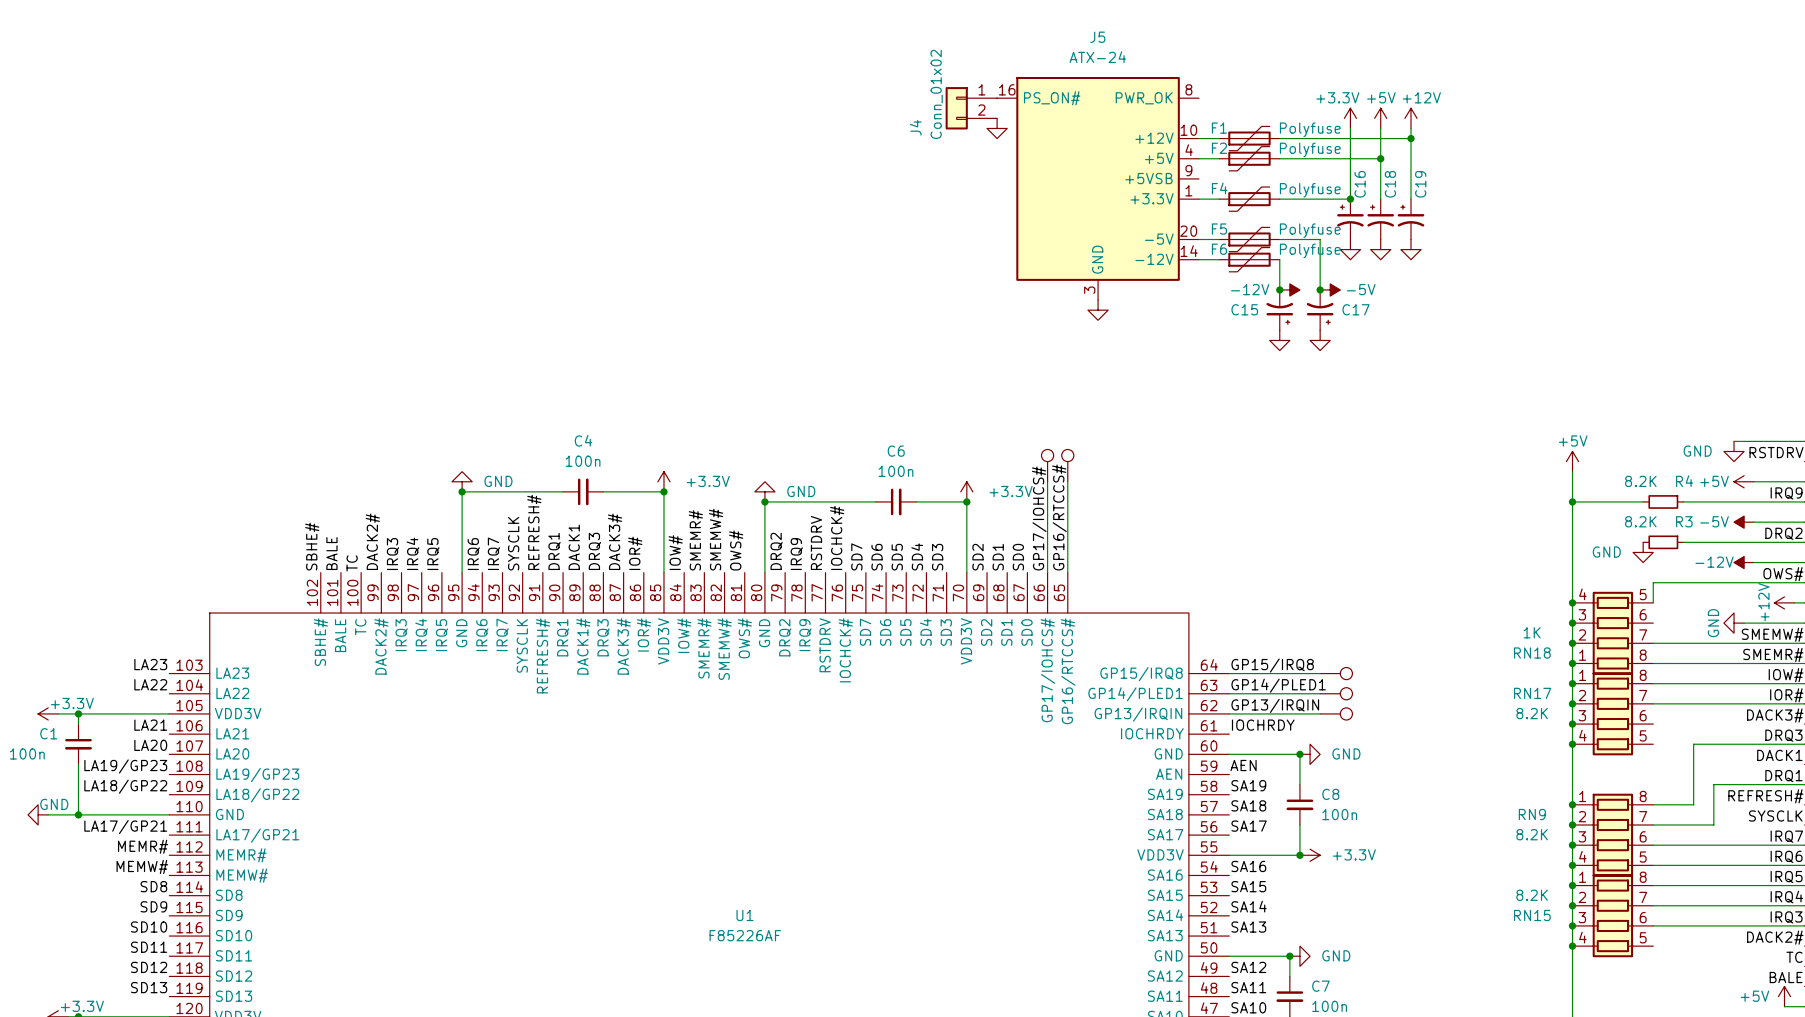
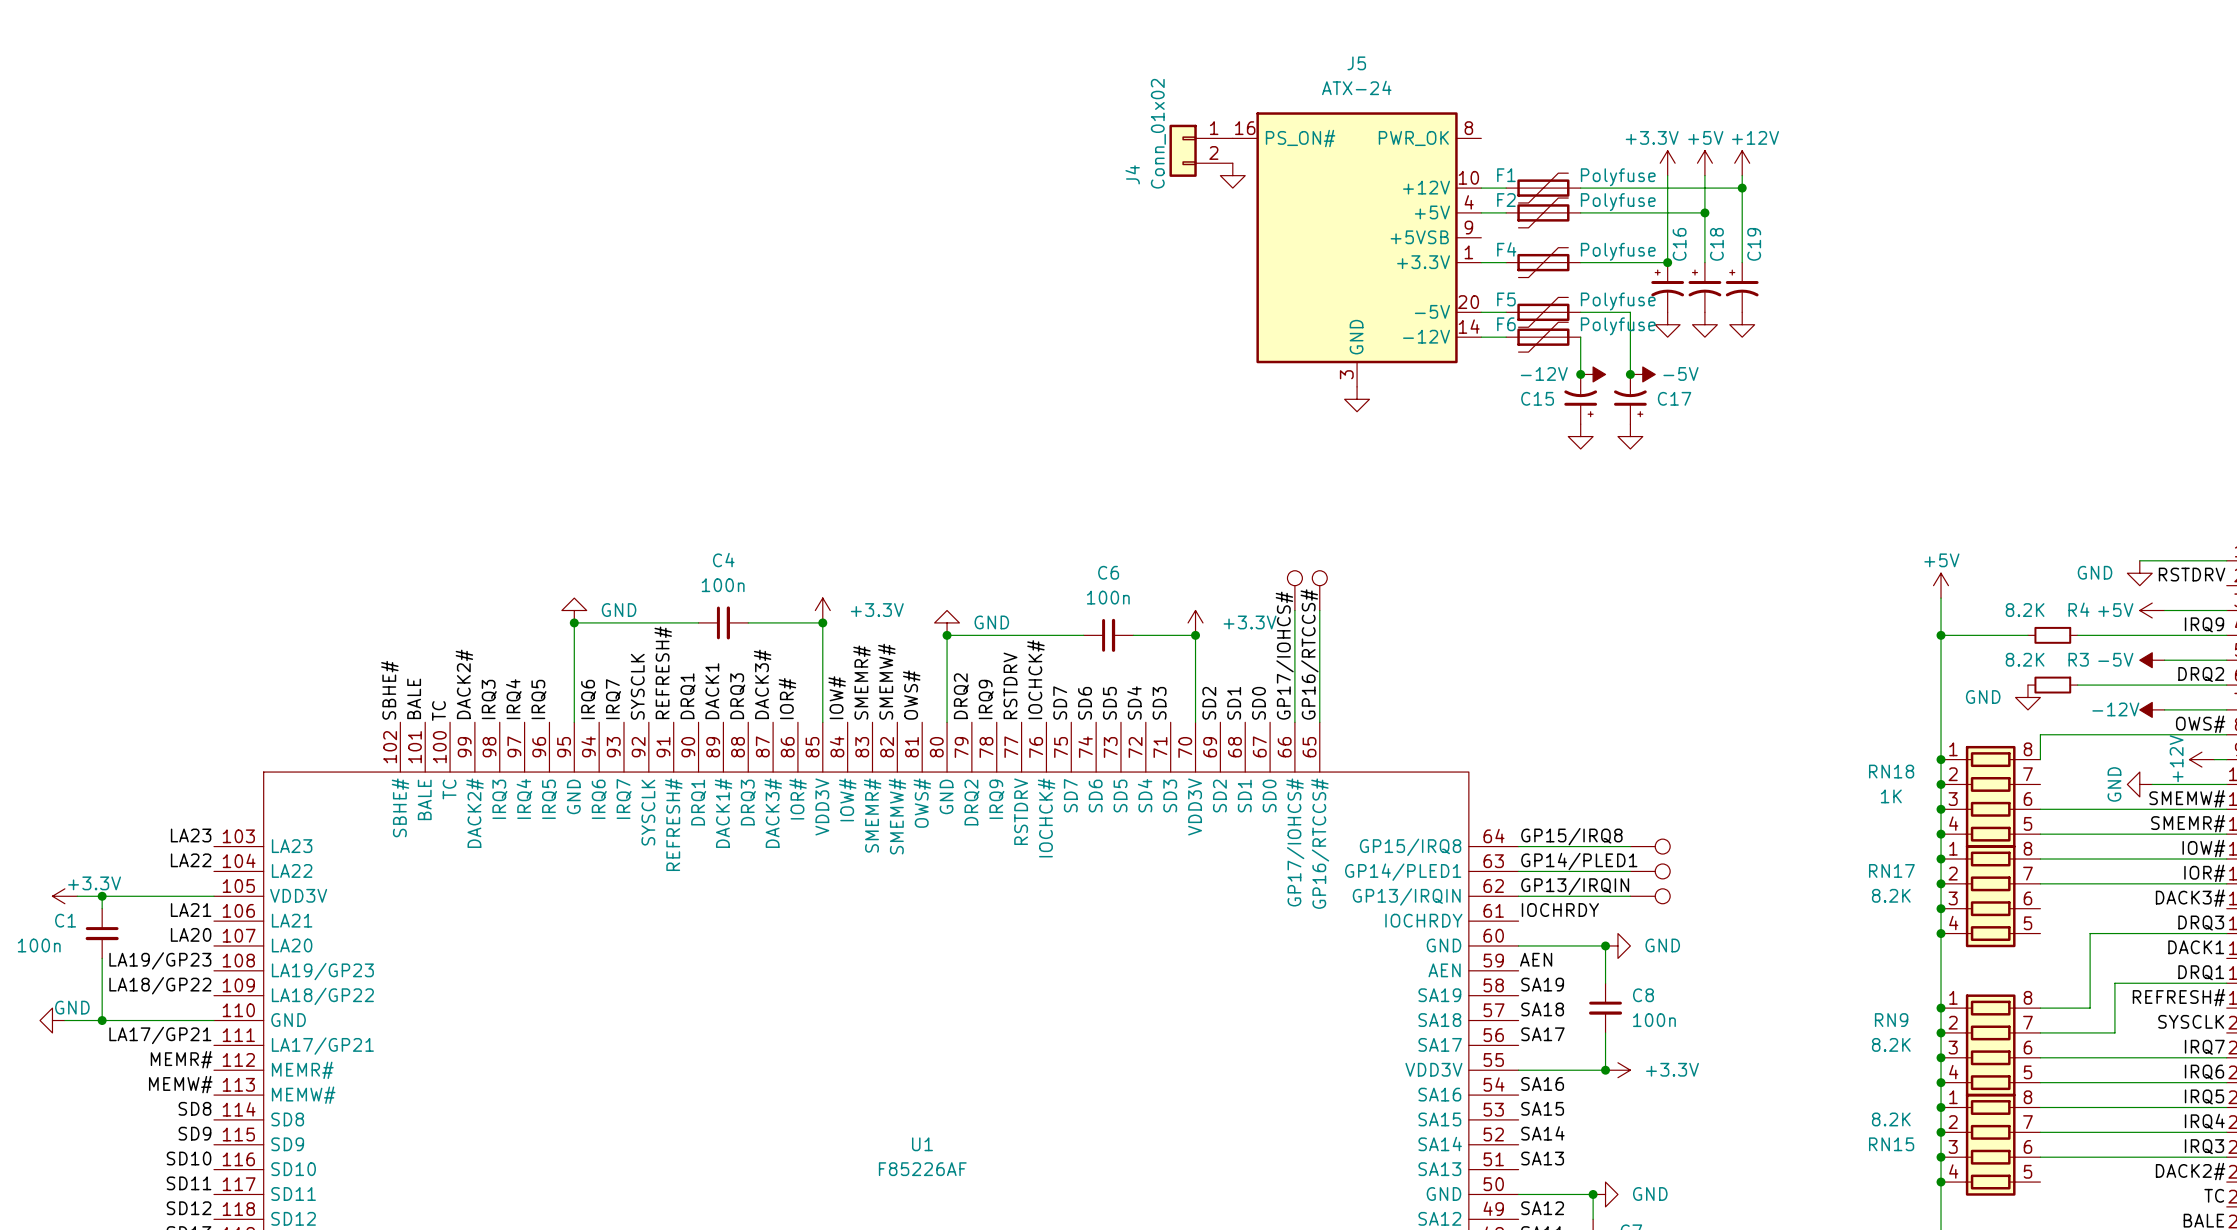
RN18 flip: as is (1612, 633) -> up-down (1990, 796)

